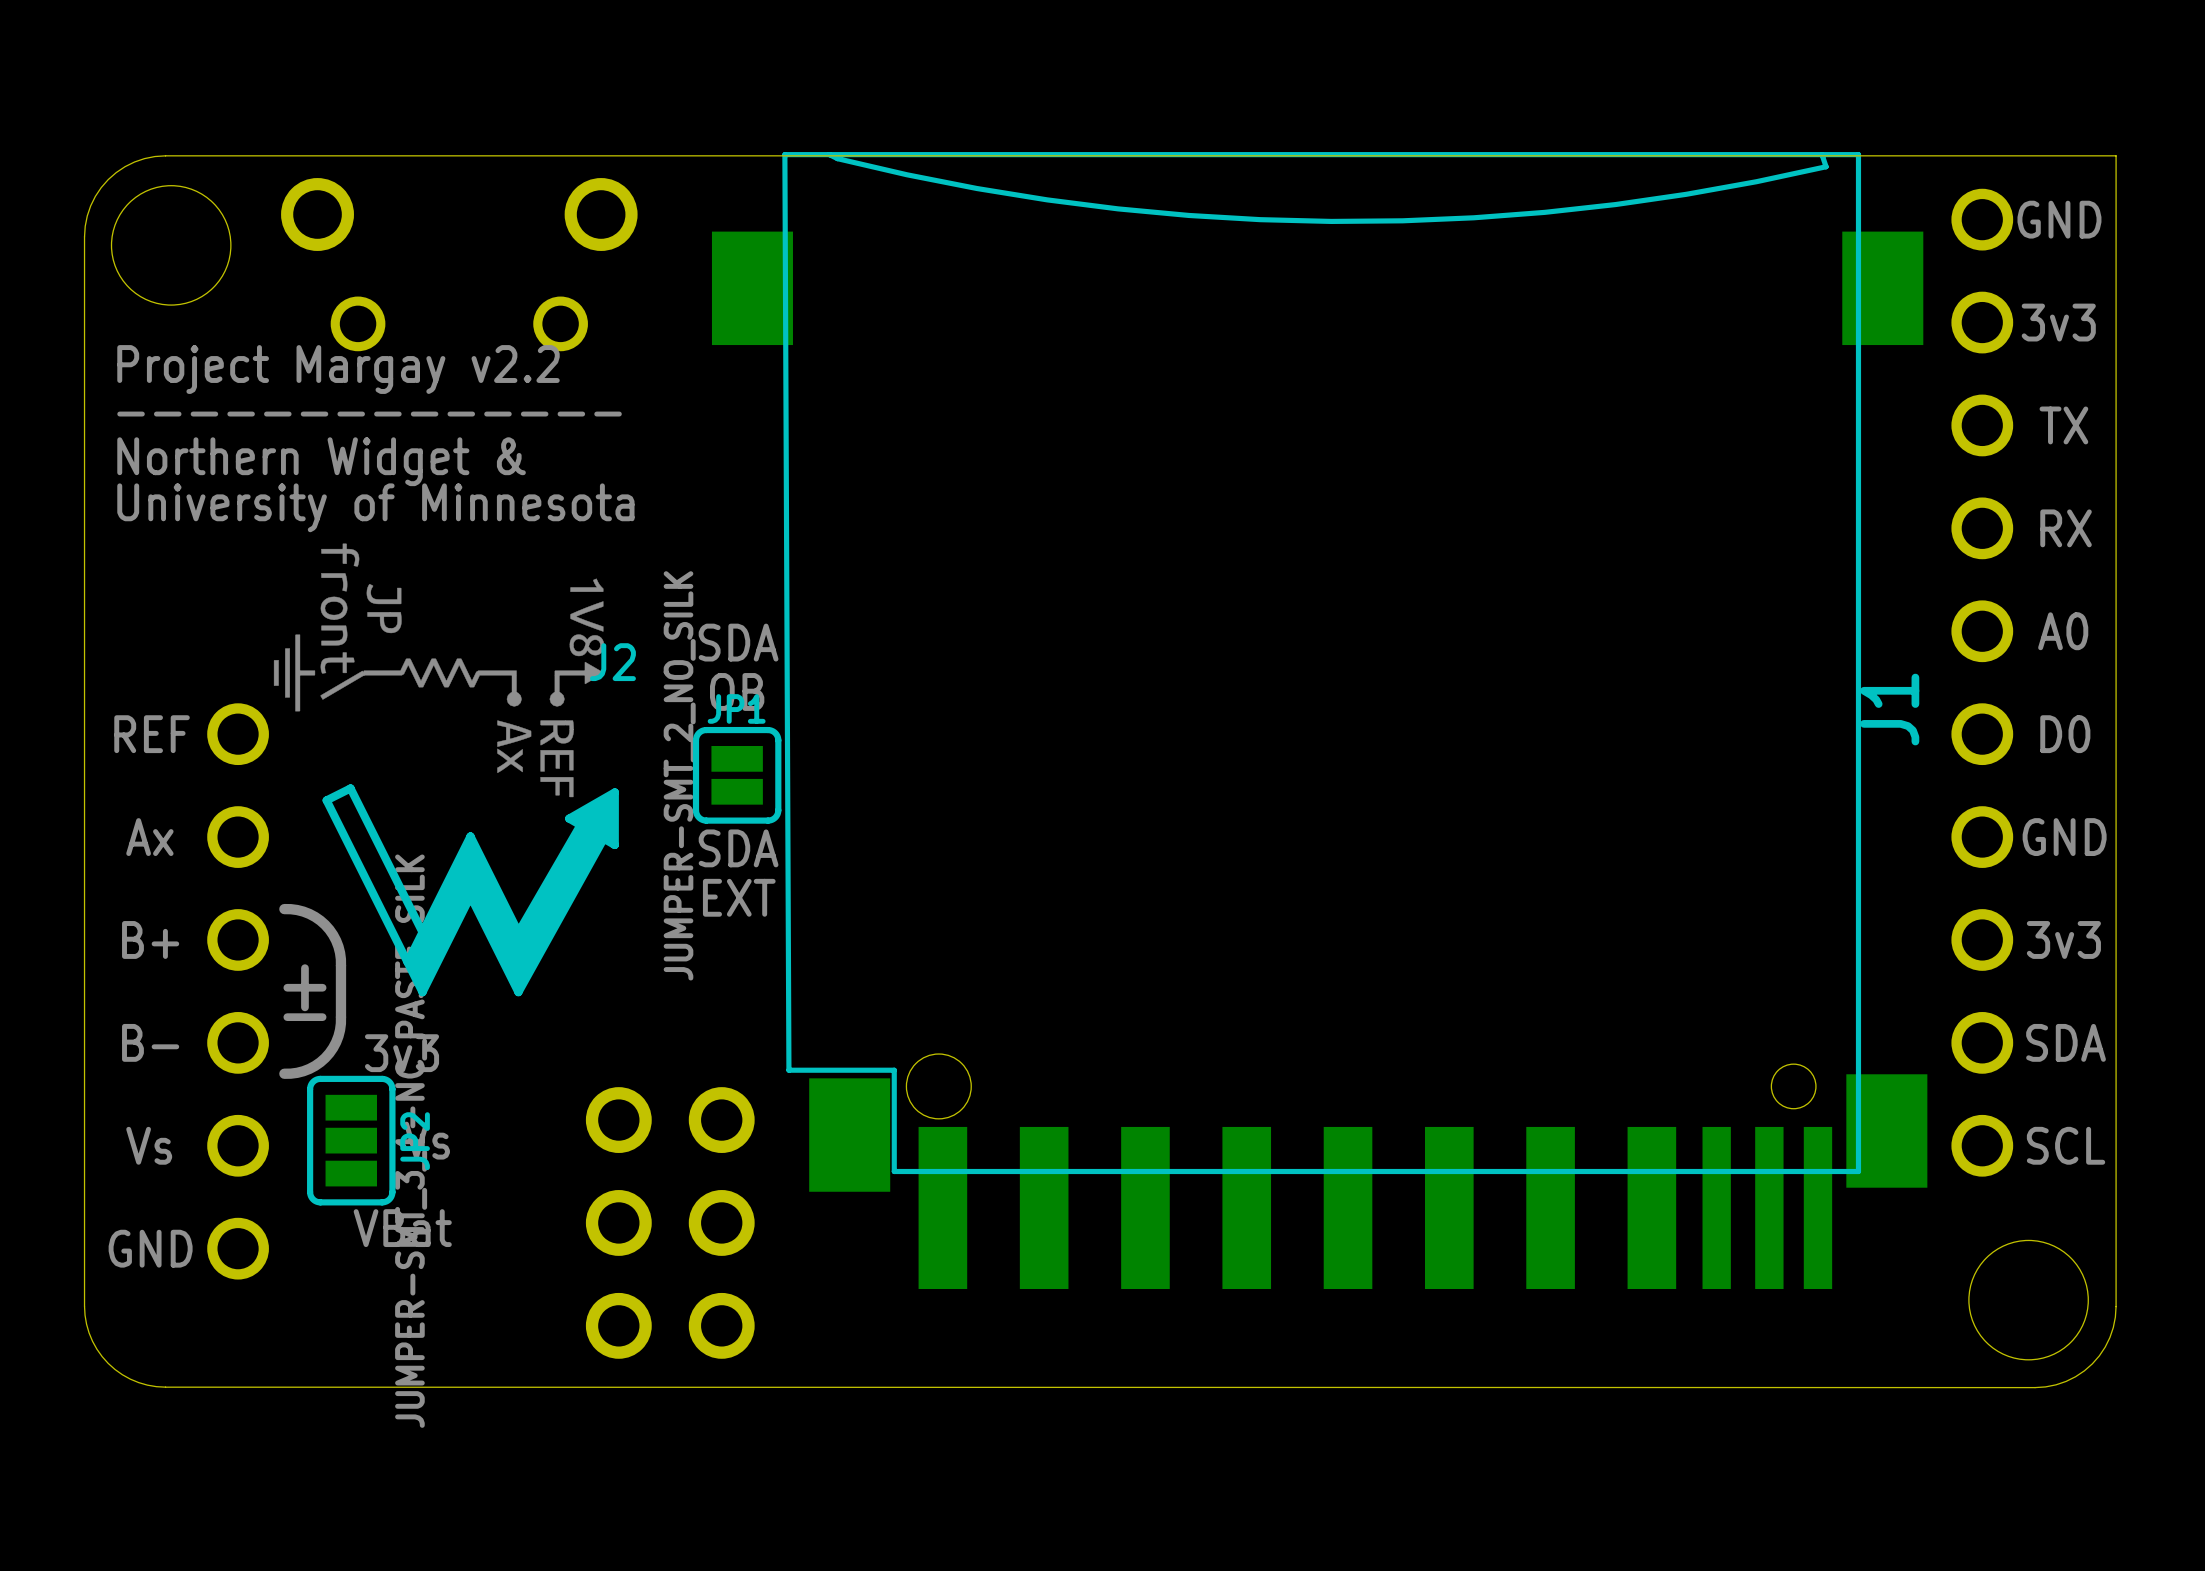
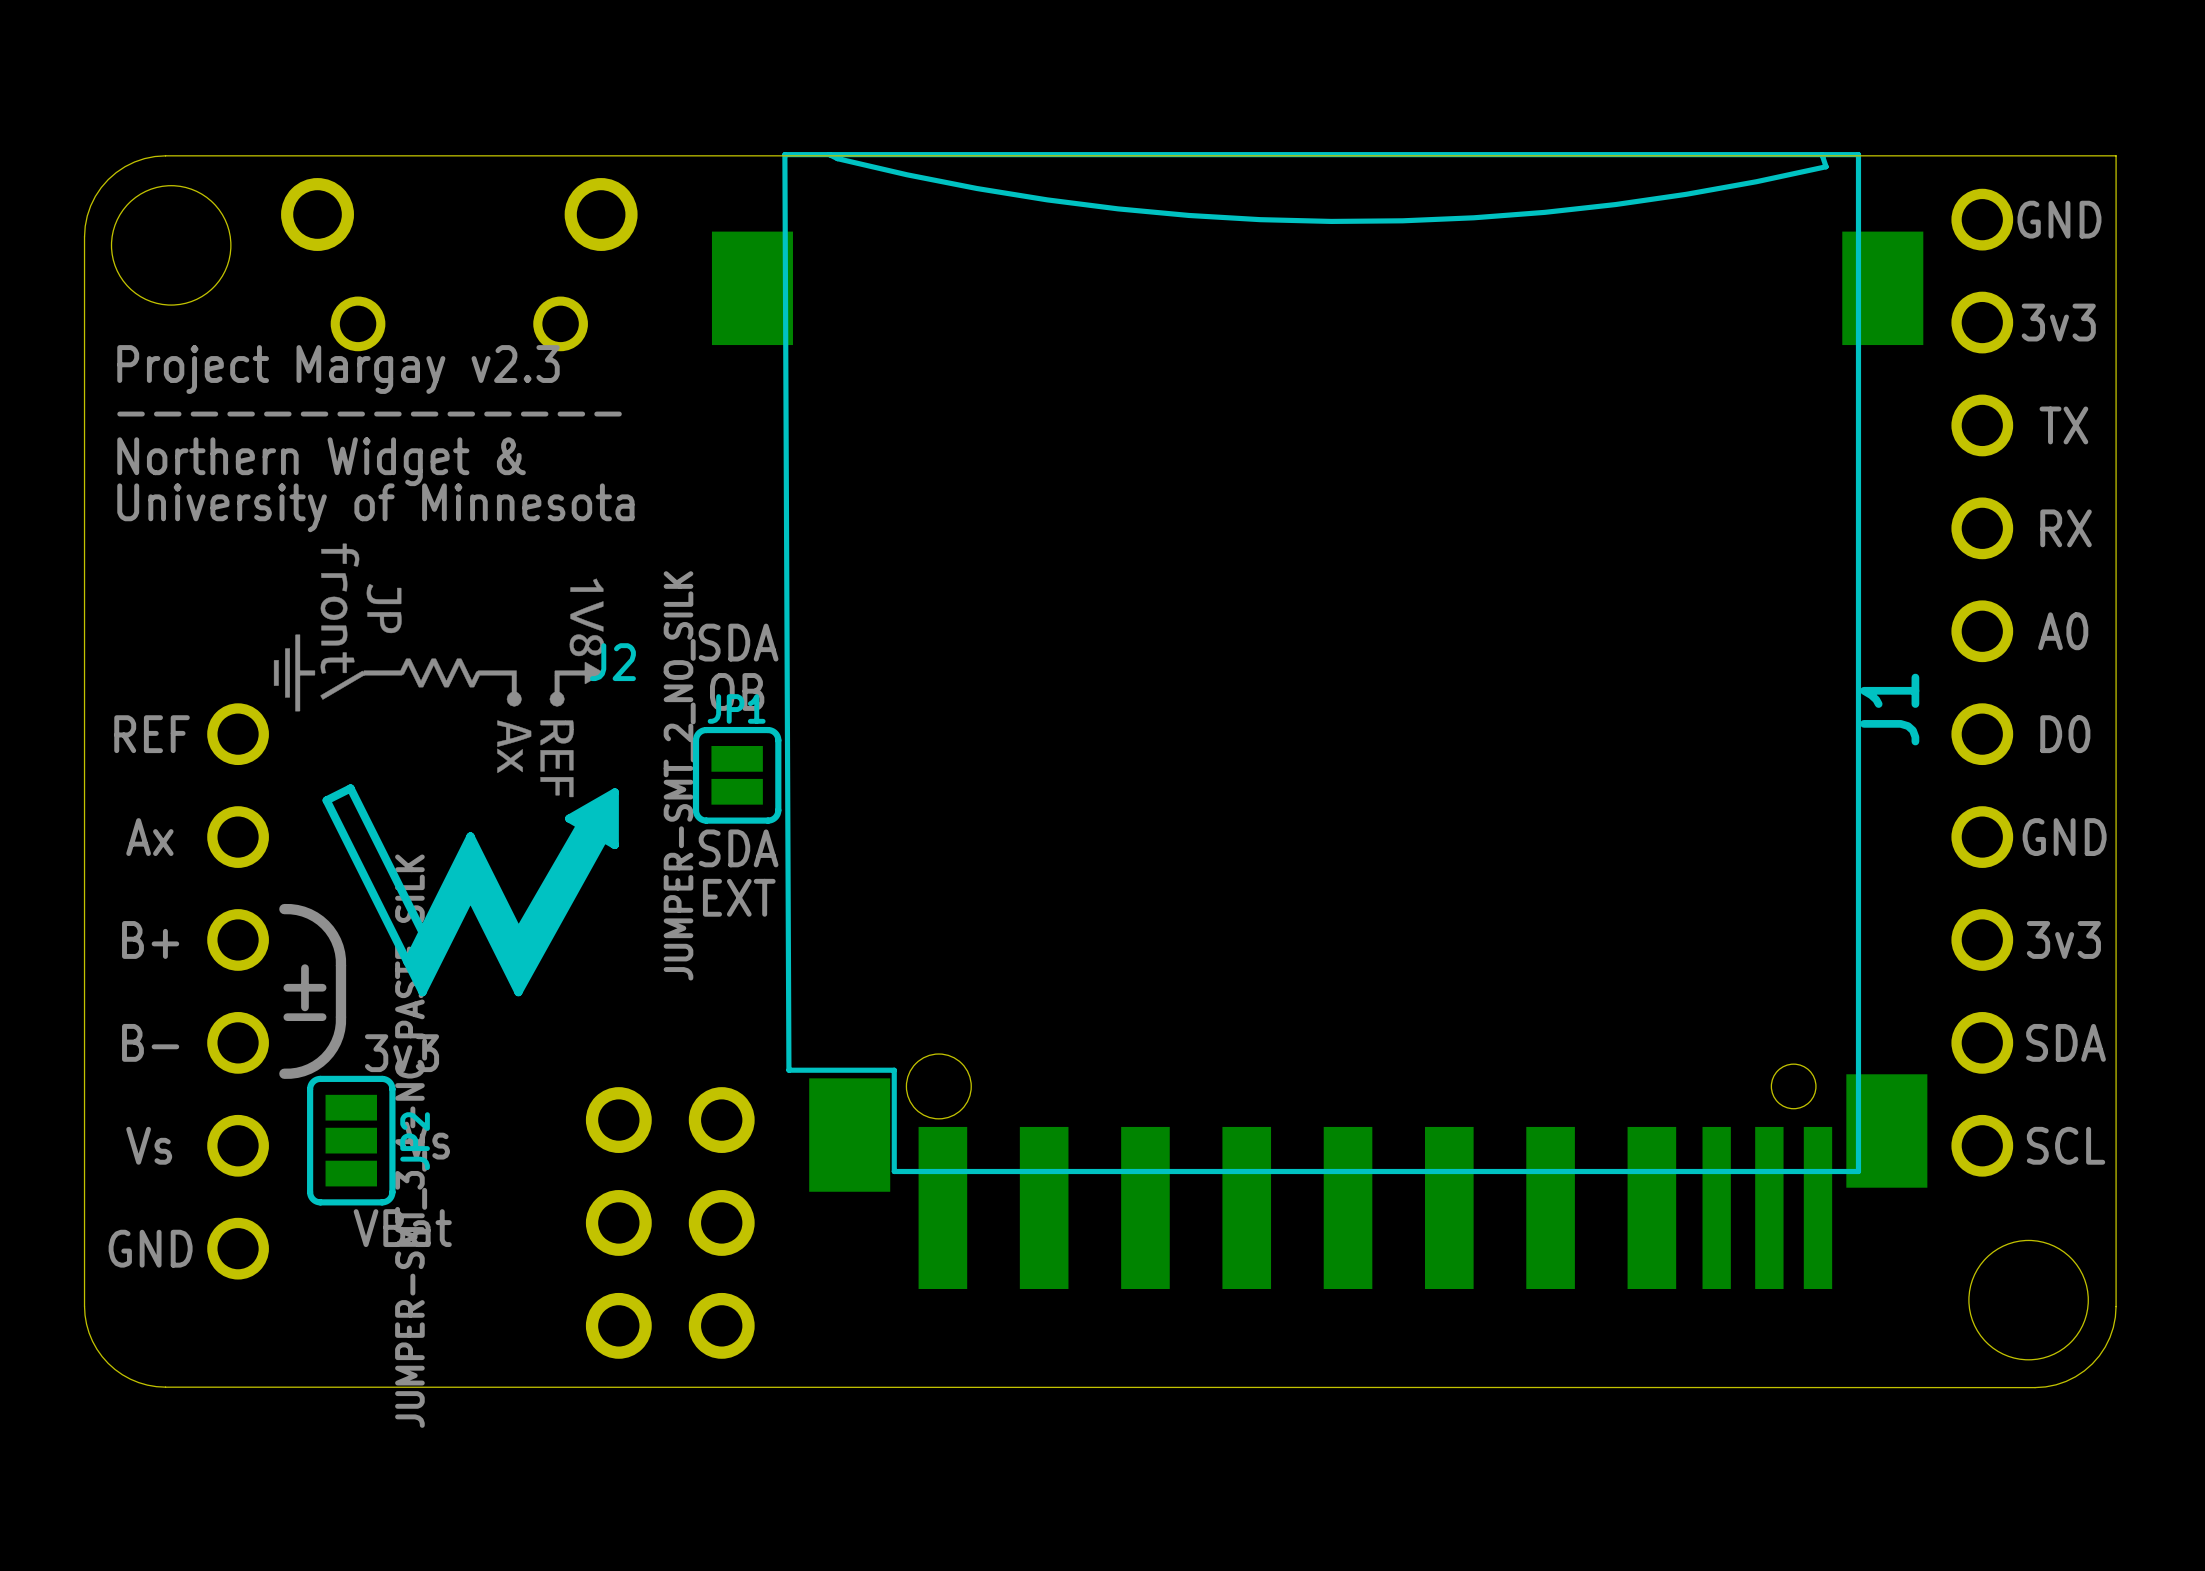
text: Project Margay v2.2 (338, 369) -> Project Margay v2.3 (338, 369)

